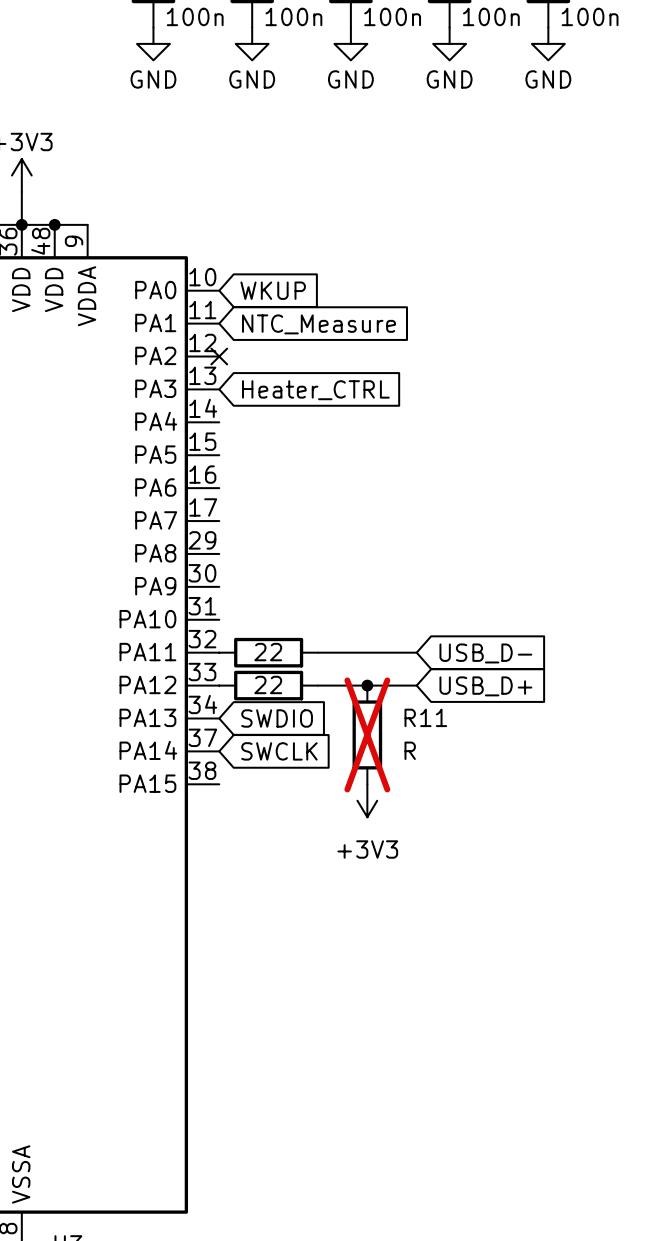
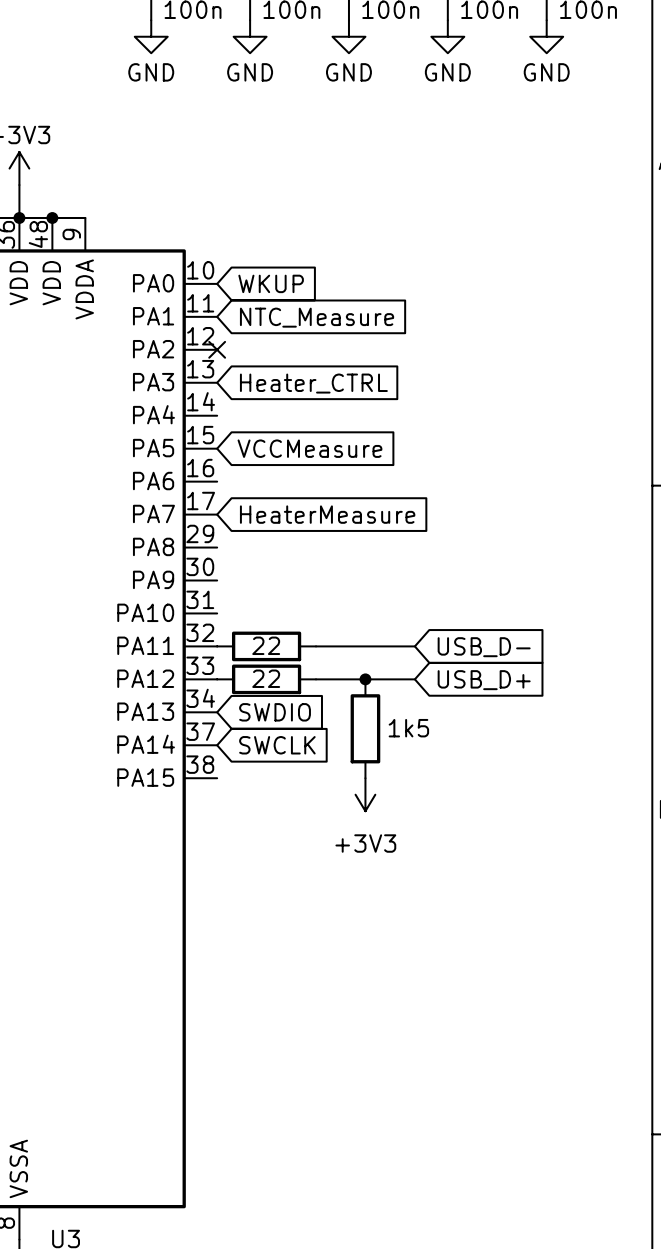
global label: none -> VCCMeasure (309, 448)
global label: none -> HeaterMeasure (327, 514)
R11 name: R11 (425, 717) -> none
R11 do-not-place cross: (367, 734) -> none
R11 value: R (410, 750) -> 1k5 (408, 728)

